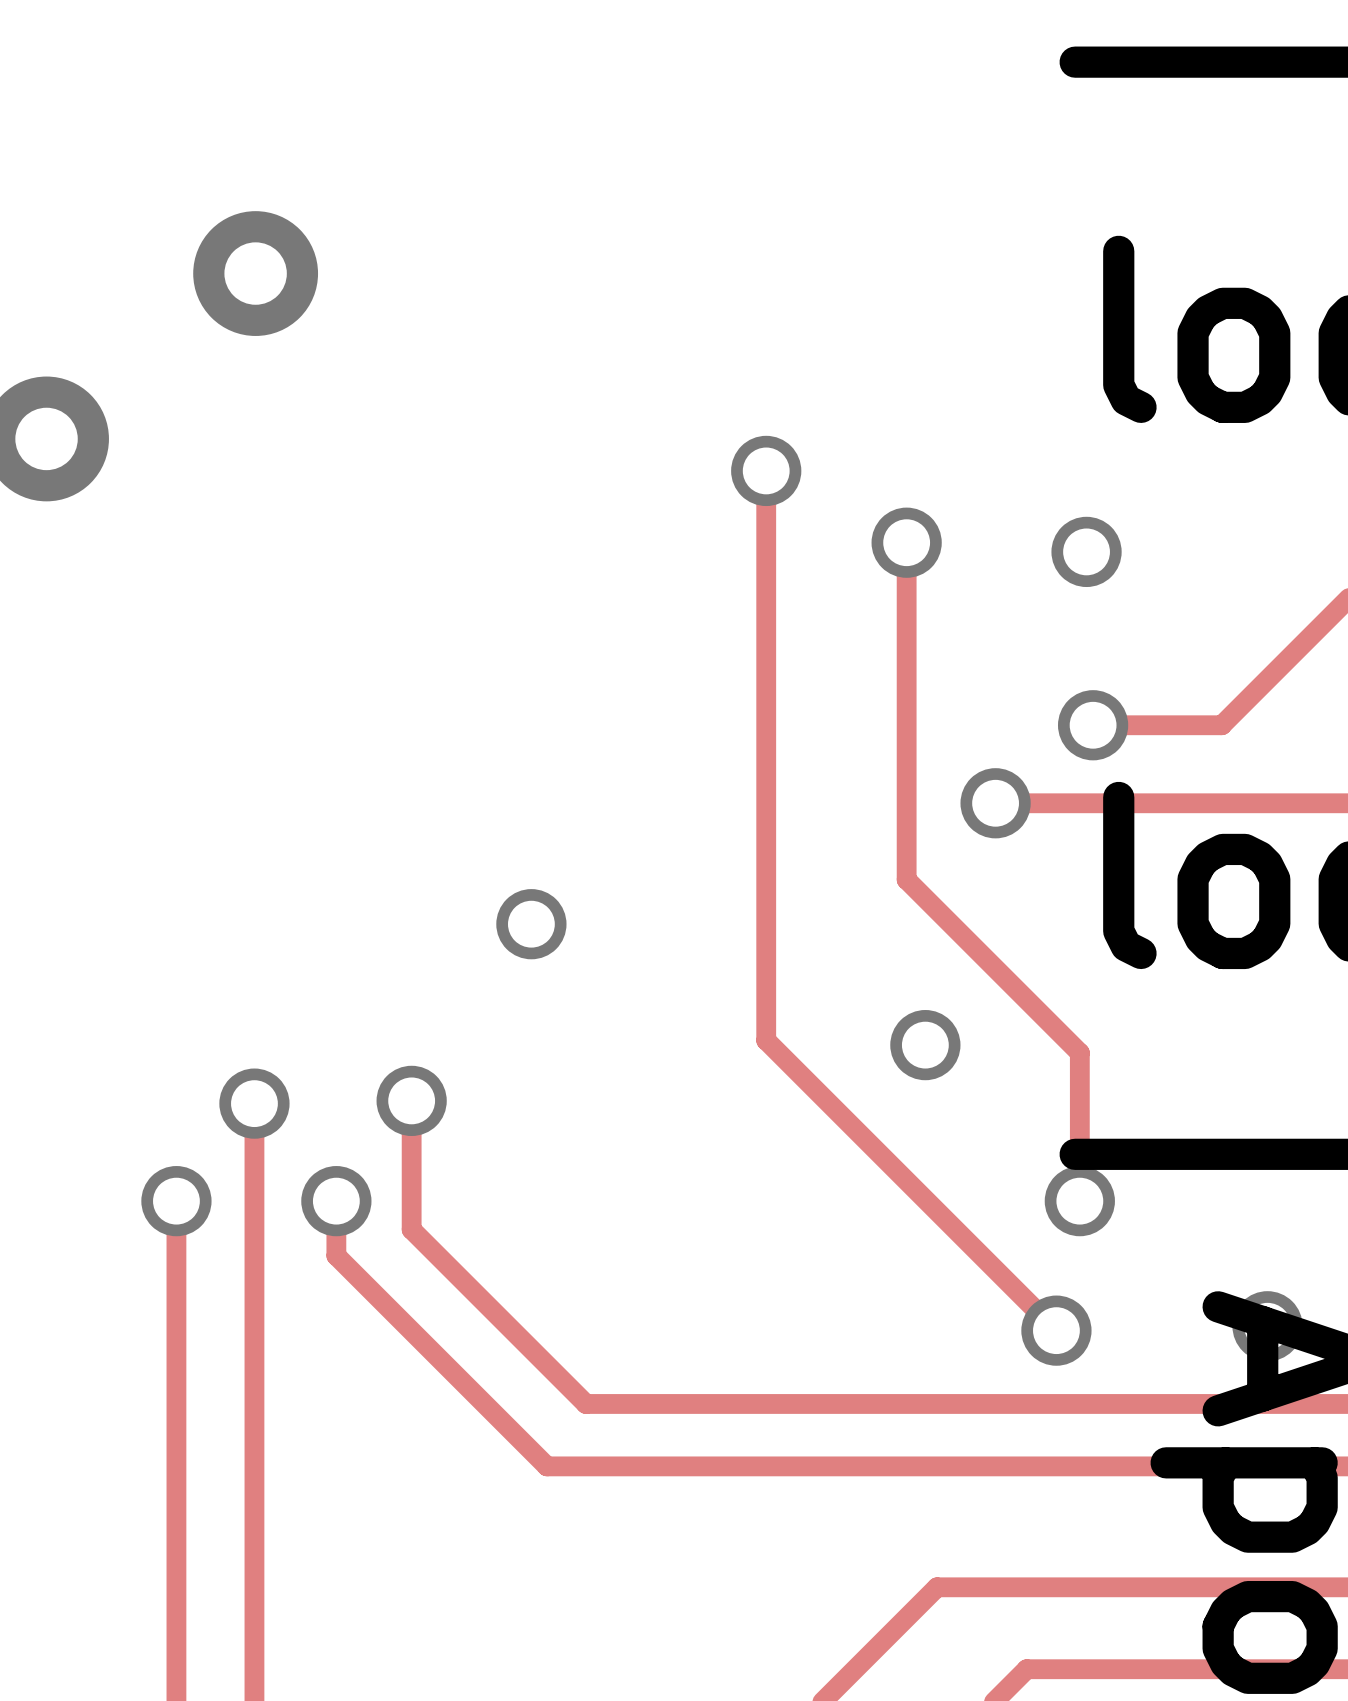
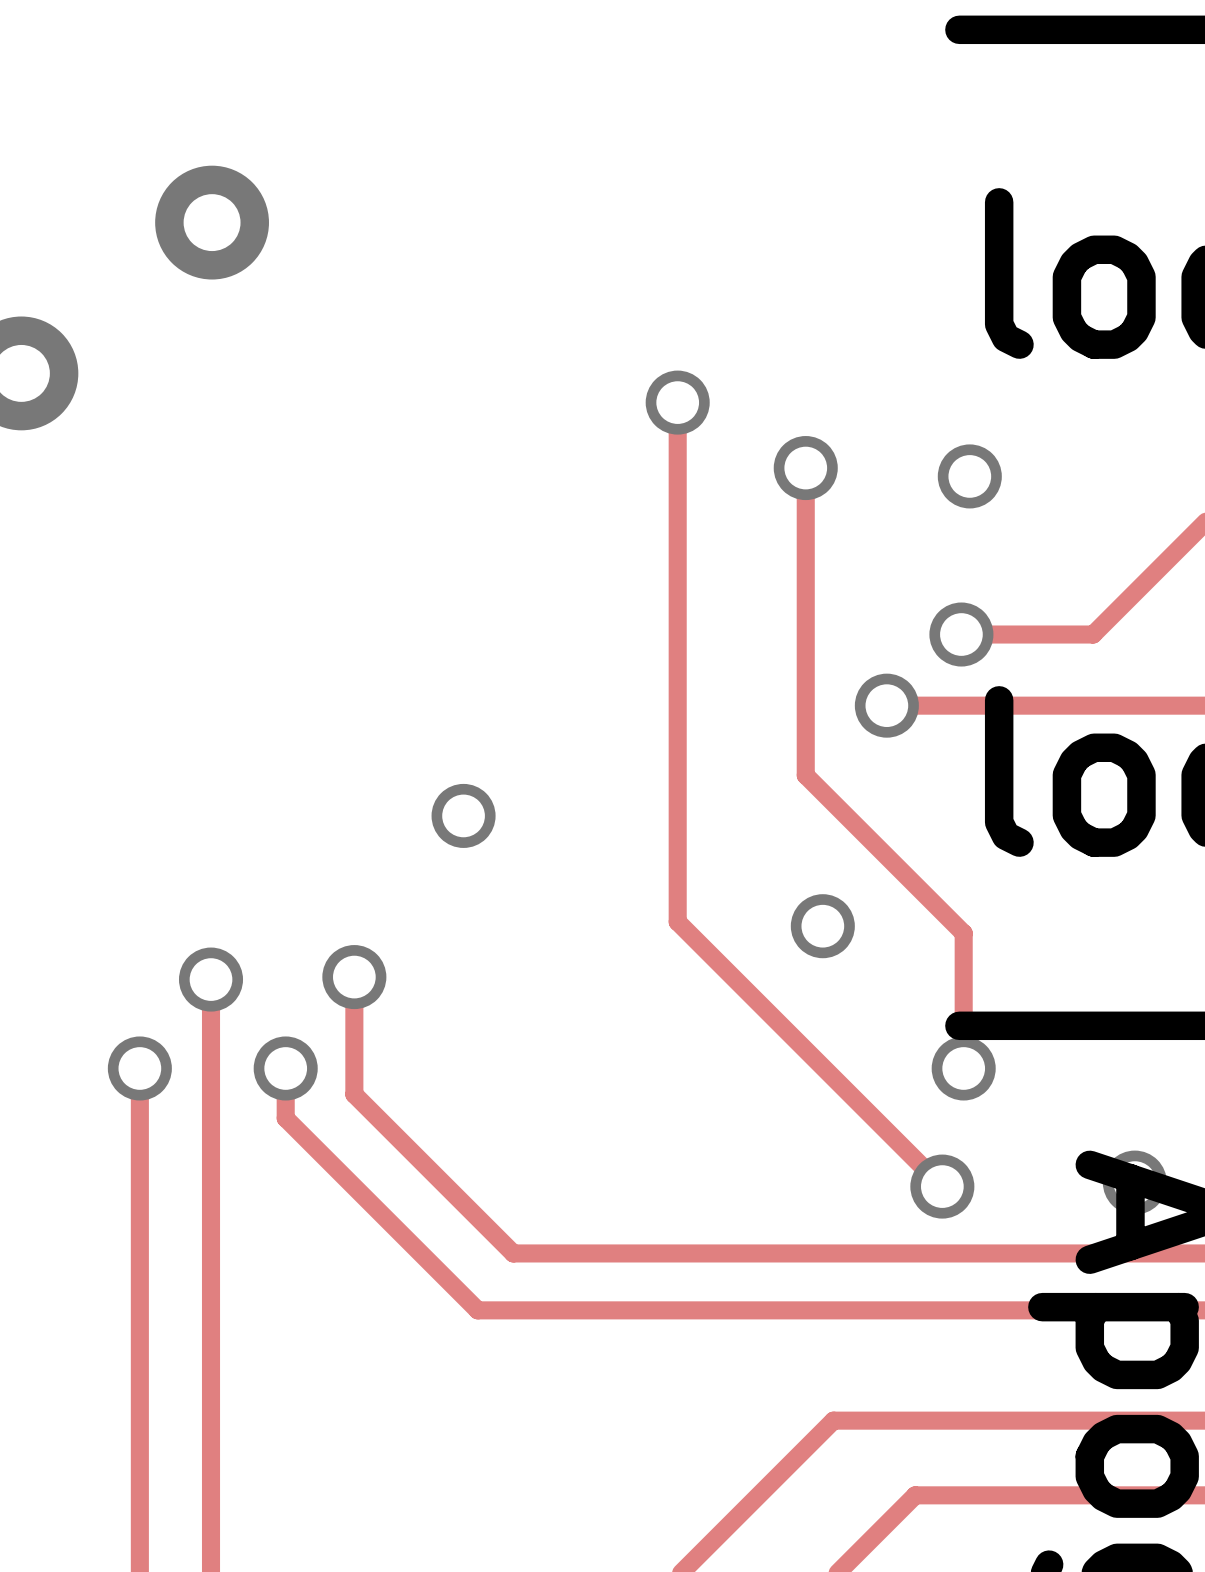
via position: (1093, 725) -> (961, 634)

